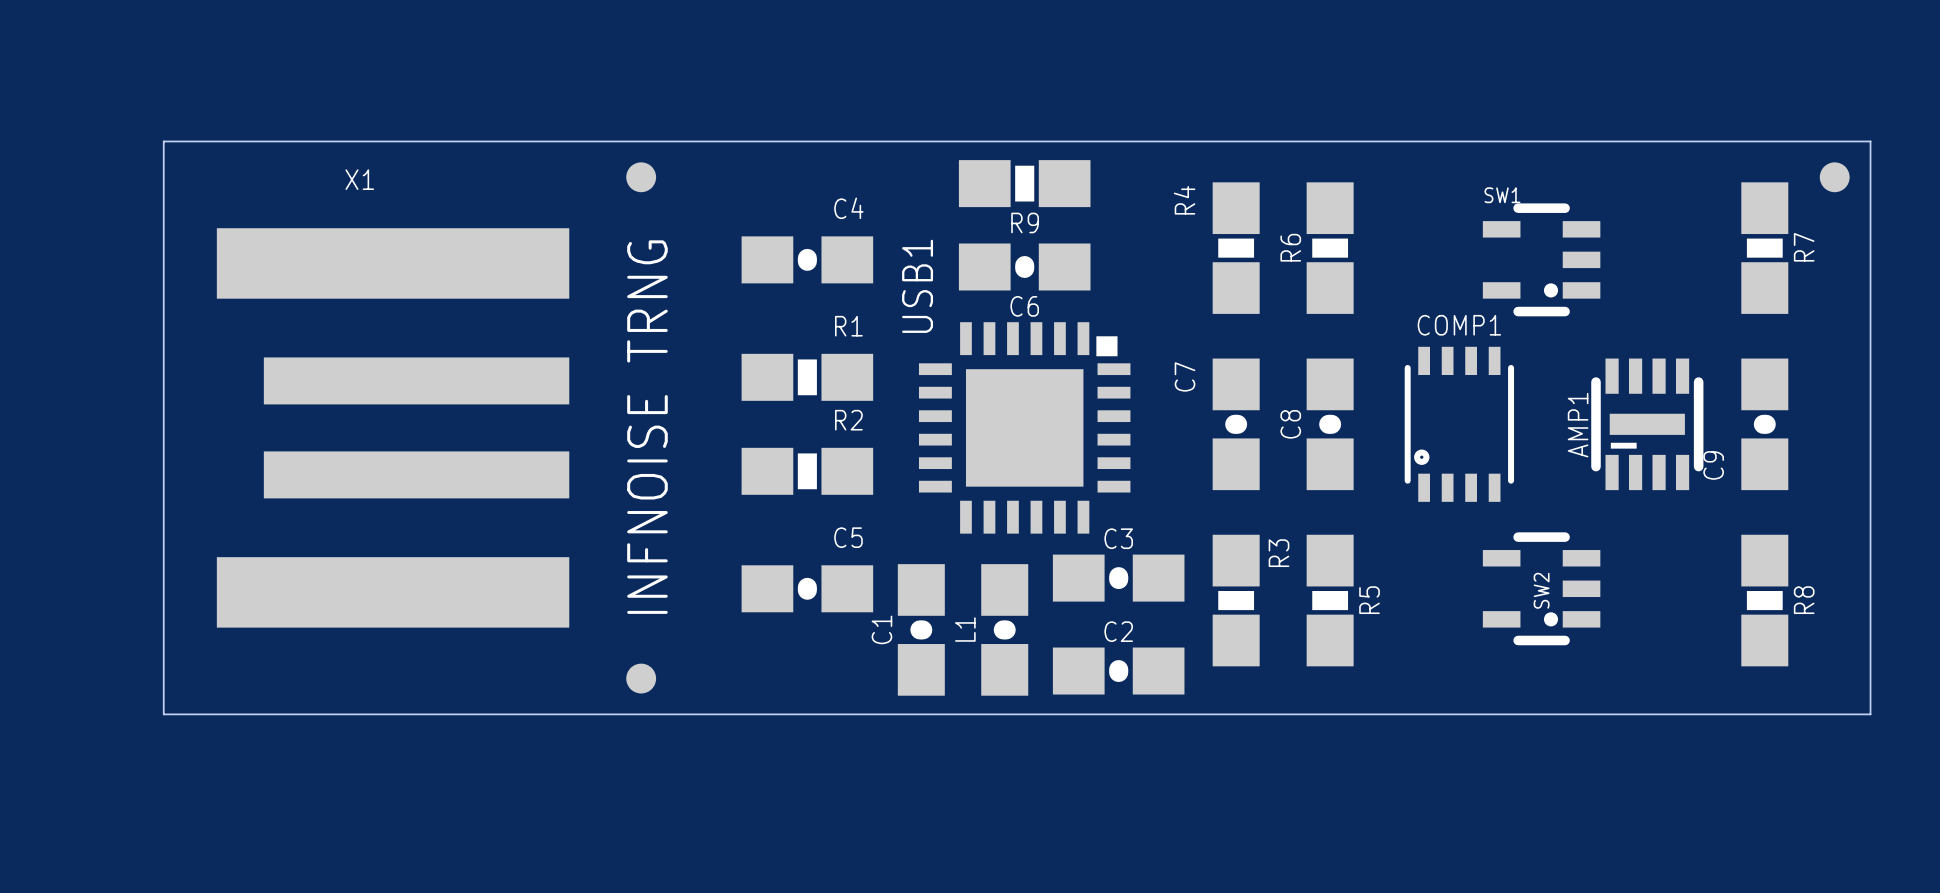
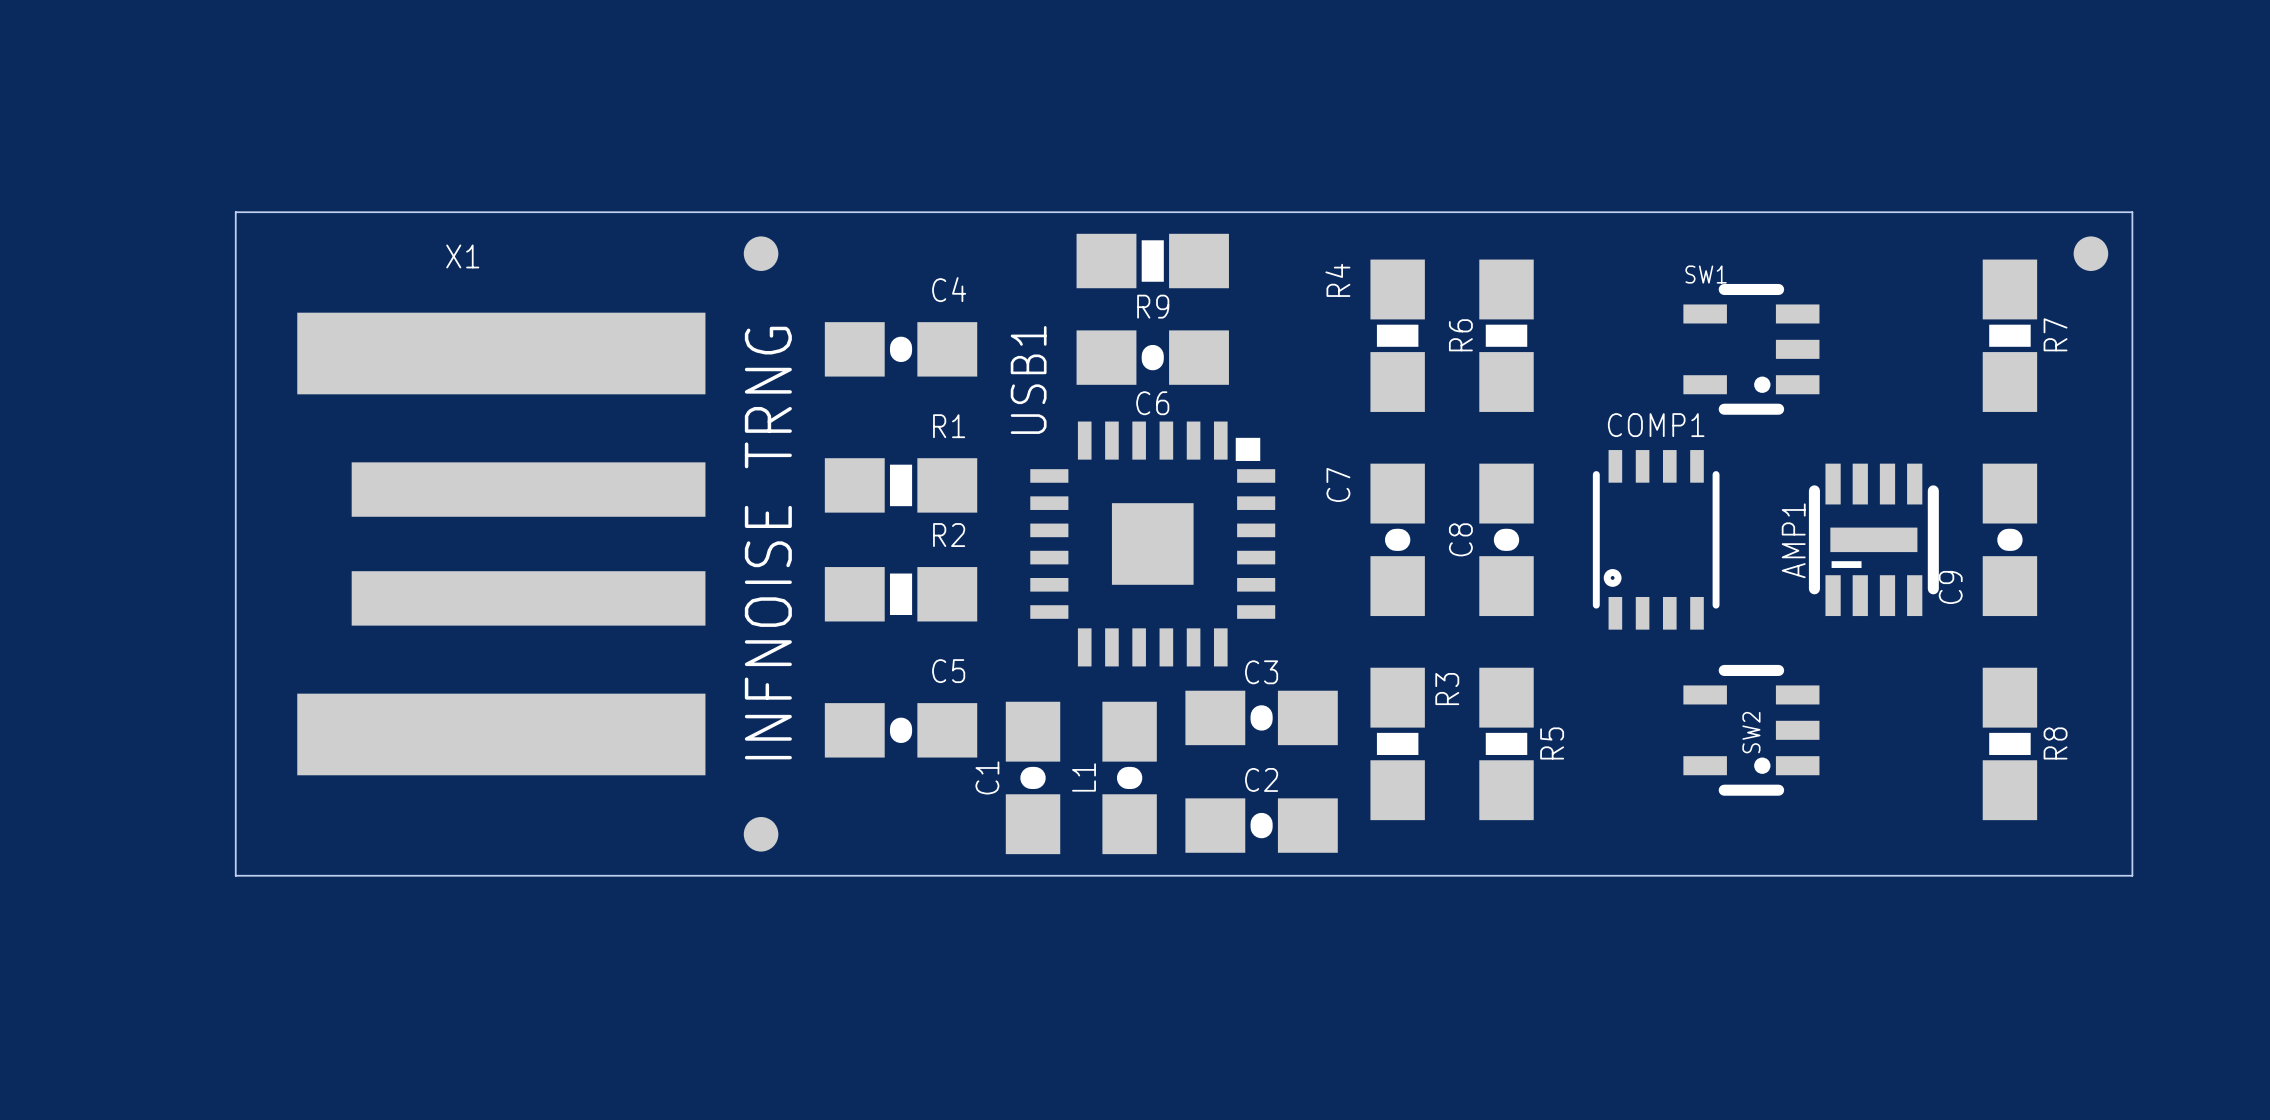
board edge: (232, 141) (163, 141) (163, 714) (232, 714) -> (235, 212) (235, 875)
part position: (641, 177) -> (761, 253)
USB1 footprint: [918, 322, 1131, 534] -> [1030, 421, 1276, 667]
X1 position: (393, 427) -> (501, 543)
text position: INFNOISE TRNG (647, 427) -> INFNOISE TRNG (768, 543)
part position: (641, 678) -> (761, 834)

